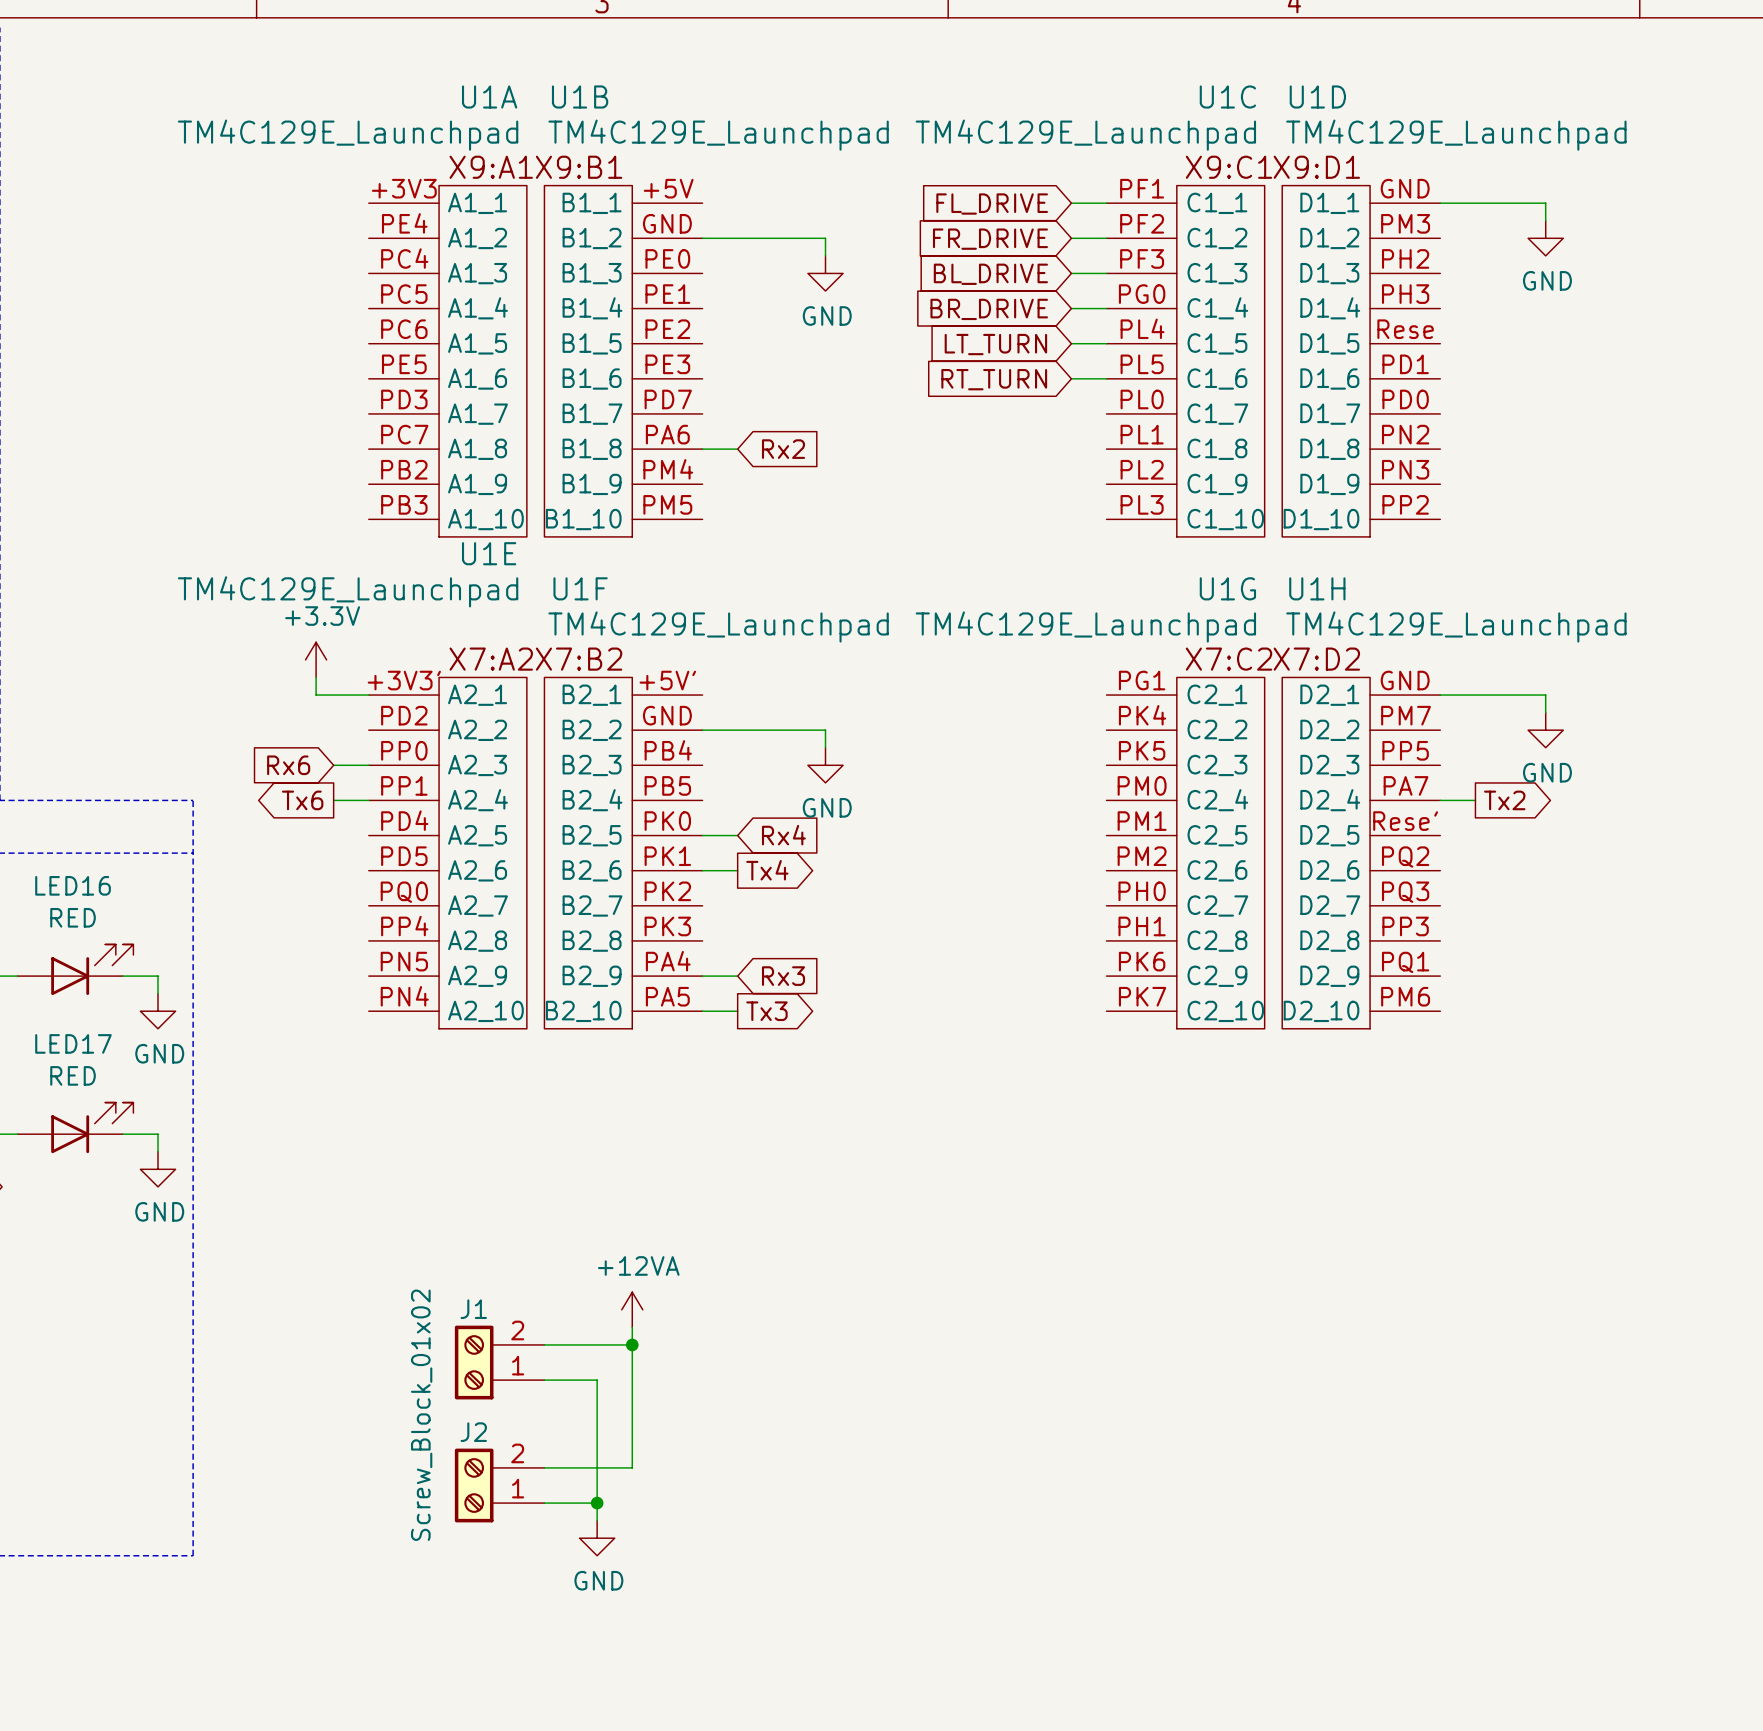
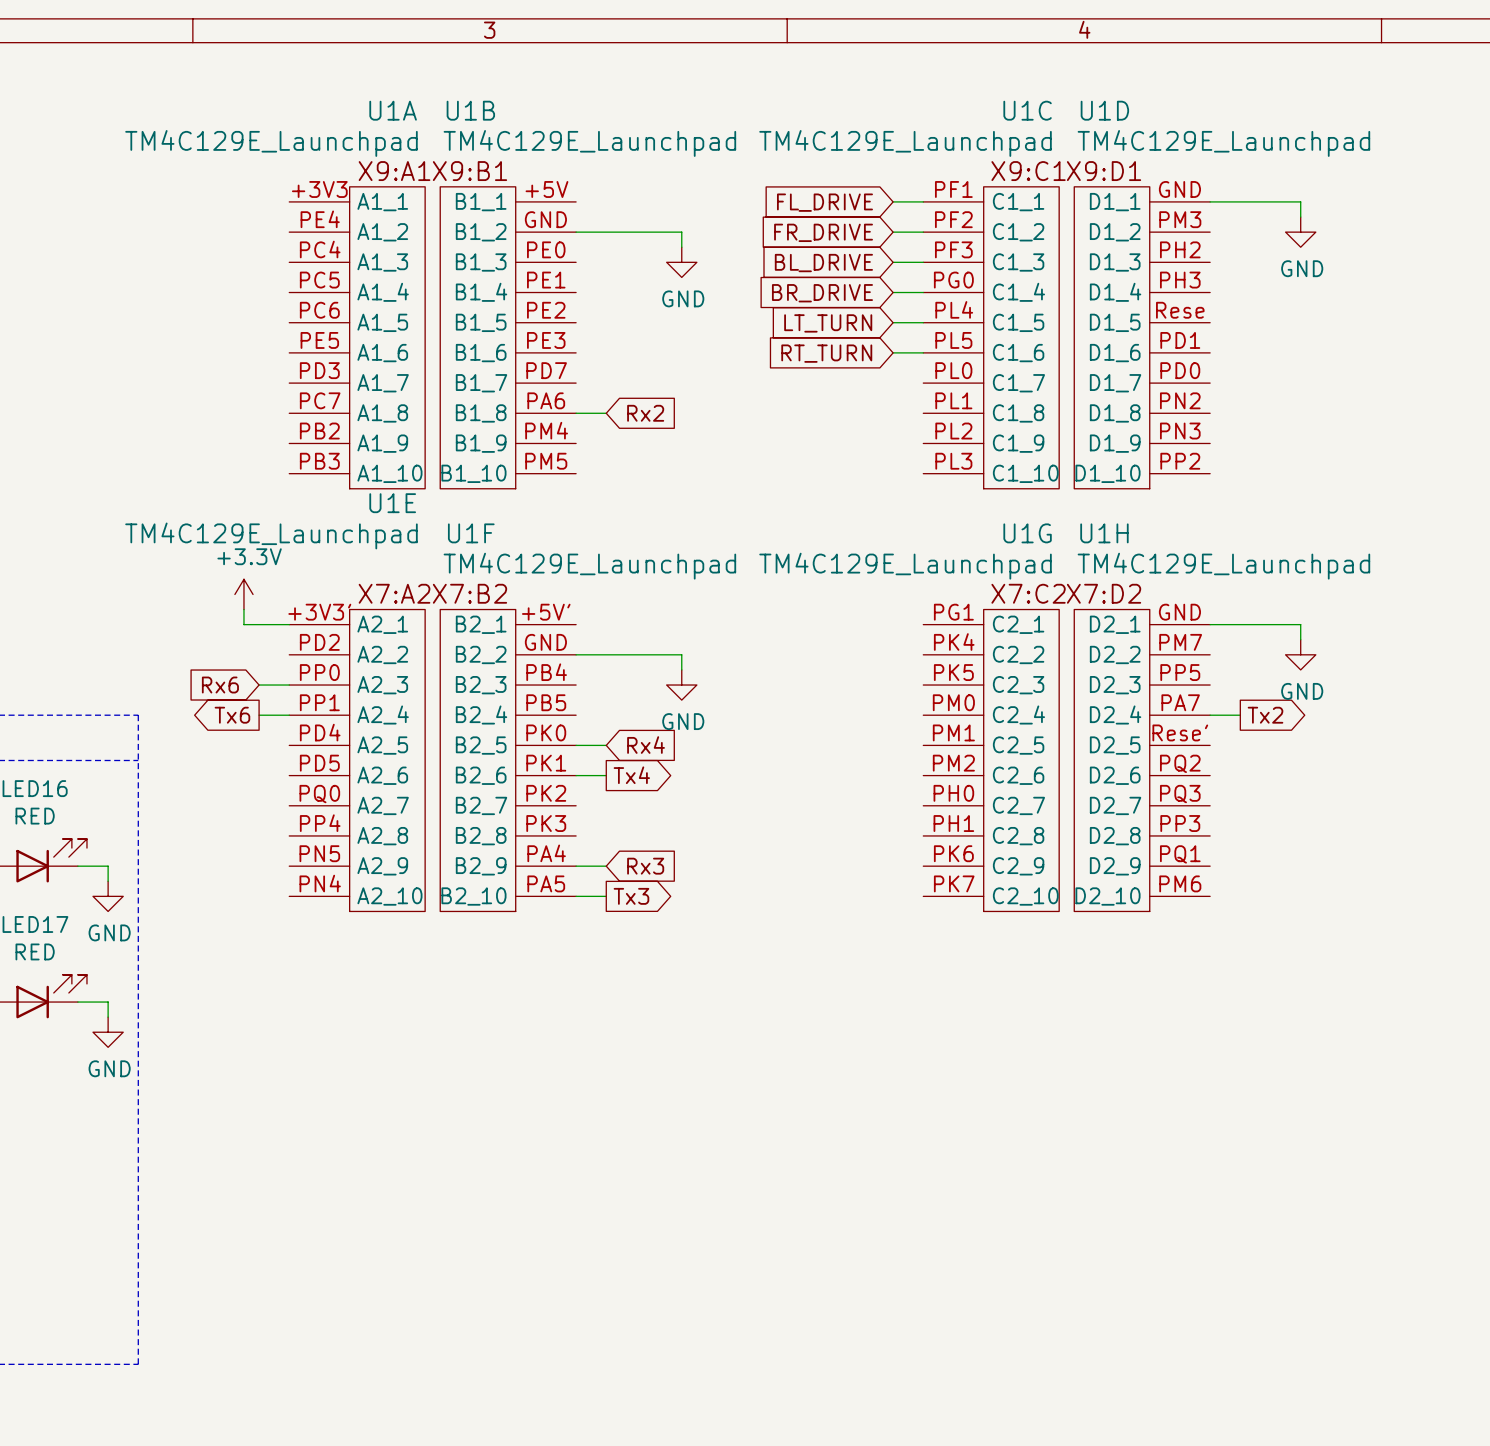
power symbol: +12VA (632, 1309) -> none
wire: (632, 1327) (632, 1467) (544, 1467) -> none
wire: (544, 1344) (632, 1344) -> none
junction: (632, 1344) -> none
J1: Screw_Block_01x02 (499, 1362) -> none
wire: (544, 1380) (597, 1380) (597, 1520) -> none
J2: (499, 1485) -> none
wire: (544, 1503) (597, 1503) -> none
junction: (597, 1503) -> none
power symbol: GND (597, 1538) -> none

